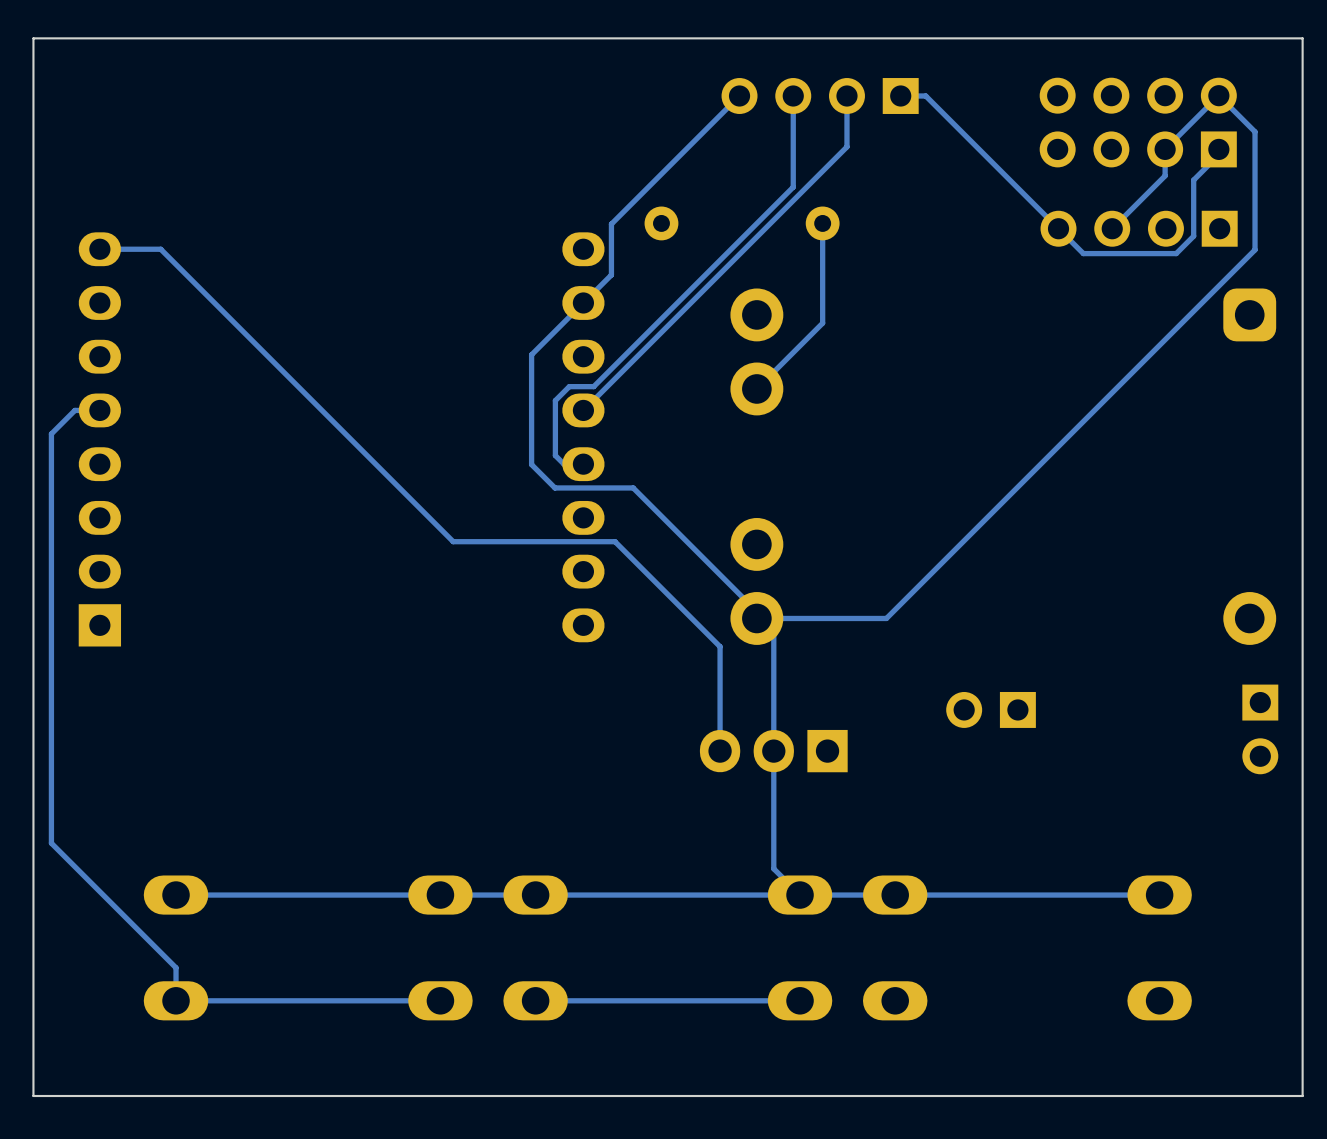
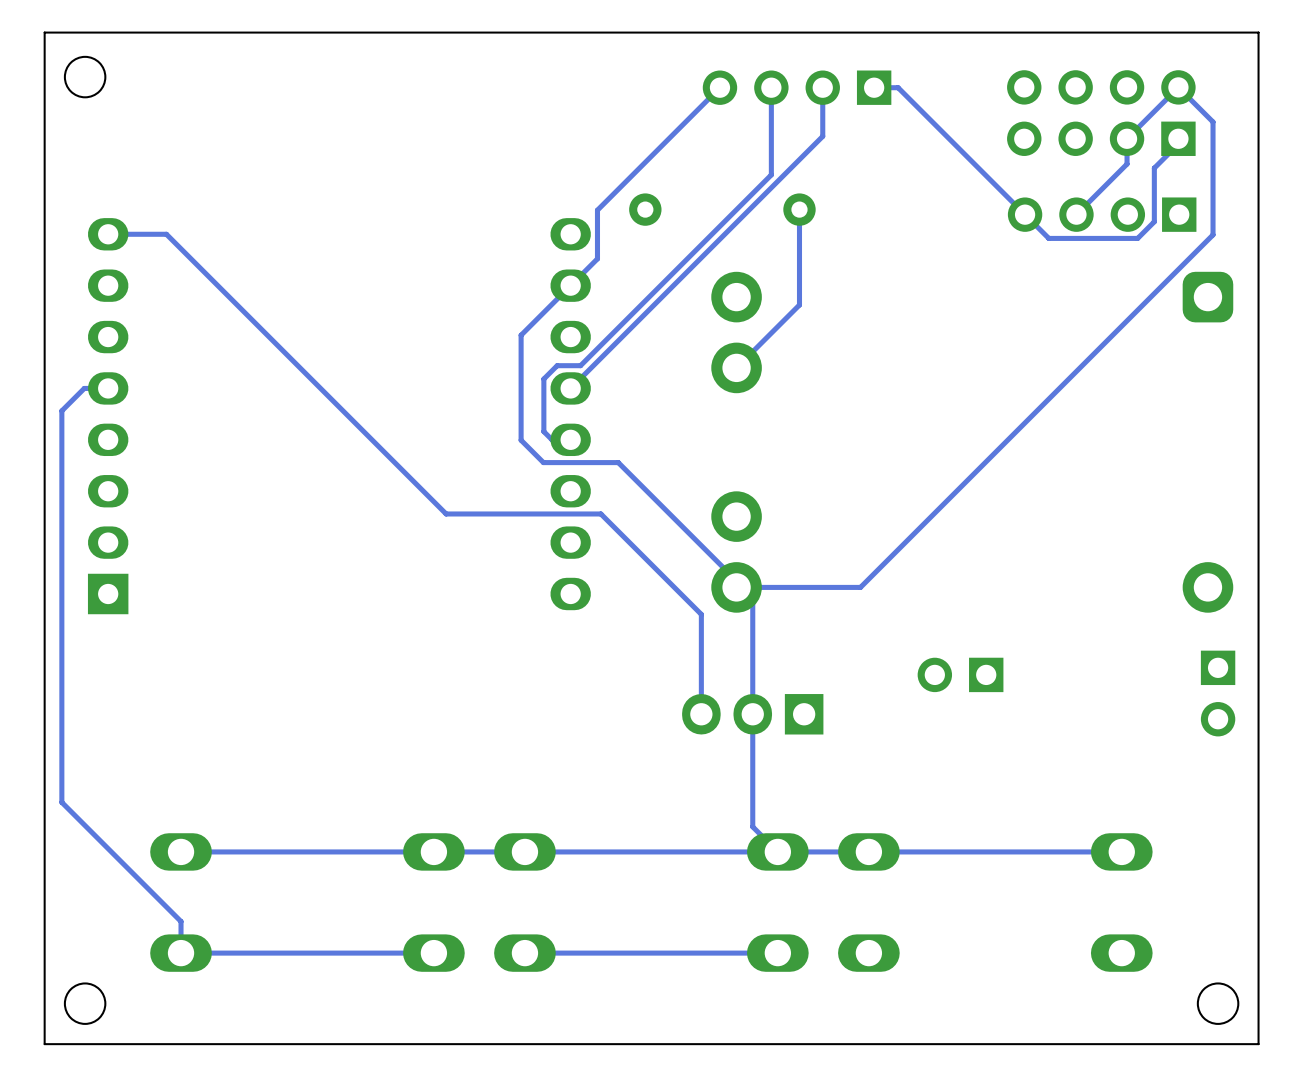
round board edge: none -> [63, 55, 107, 99]
round board edge: none -> [63, 982, 107, 1025]
round board edge: none -> [1196, 982, 1240, 1025]

